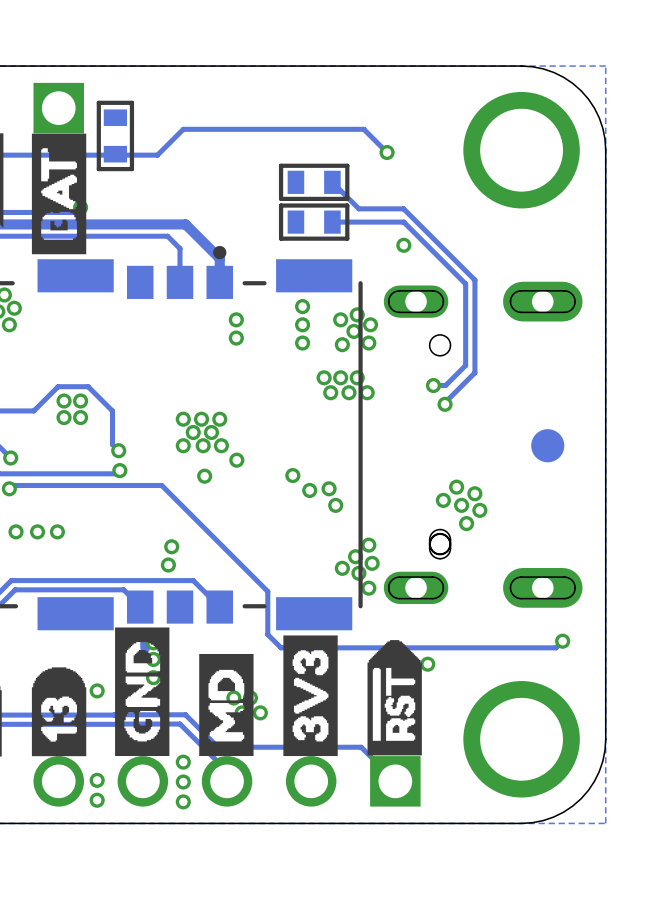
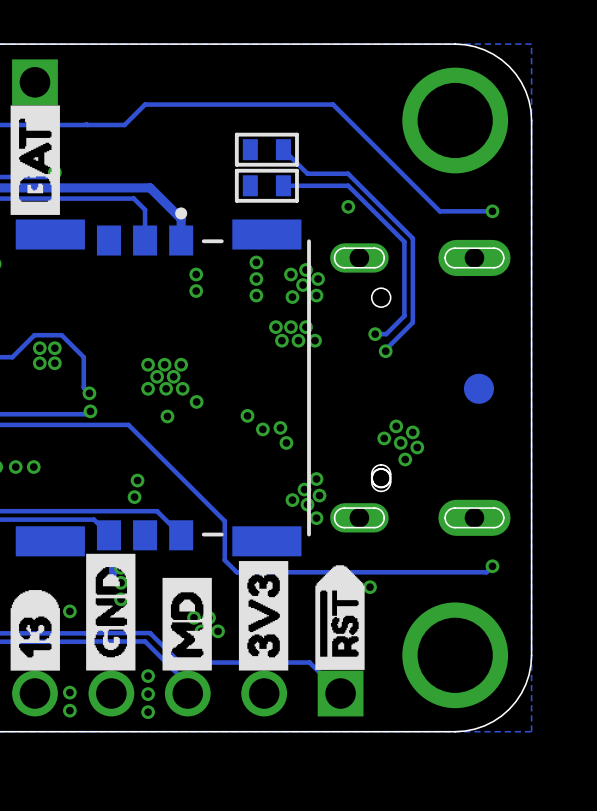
track: (180, 132) (183, 129) (363, 129) (387, 152) -> (145, 104) (333, 104) (439, 211) (492, 211)
part: (115, 135) -> none
via: (387, 152) -> none
via: none -> (492, 211)

